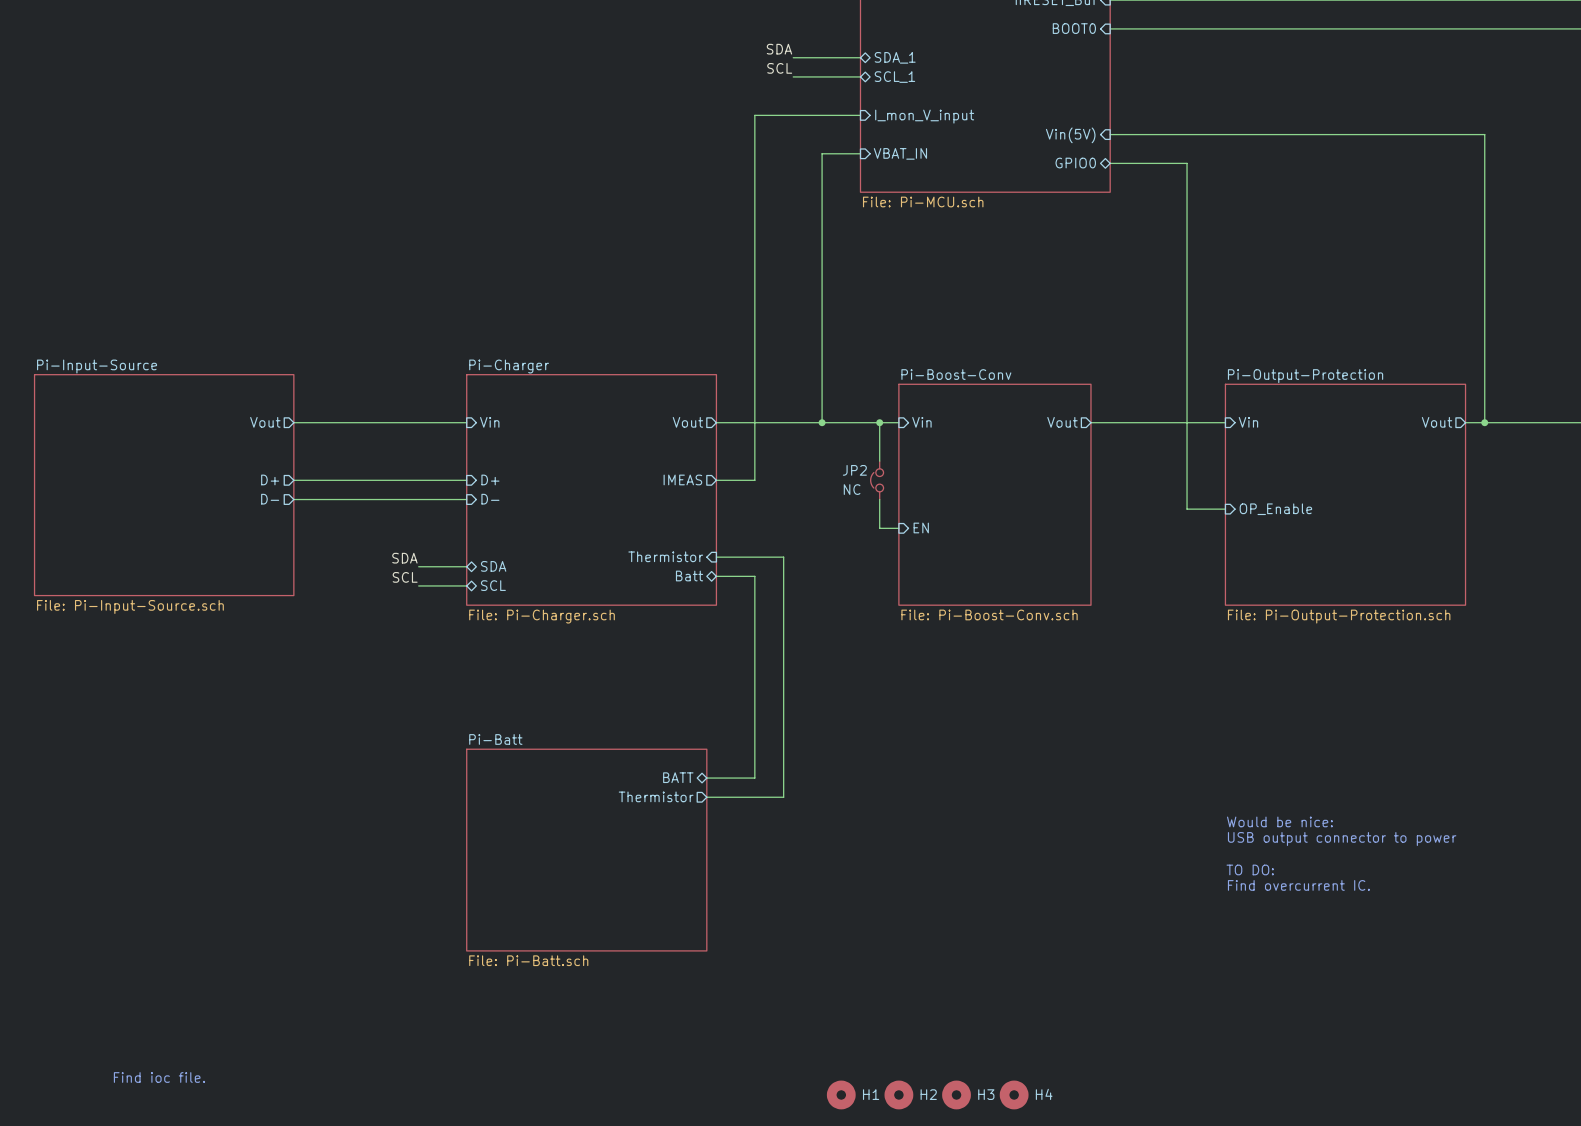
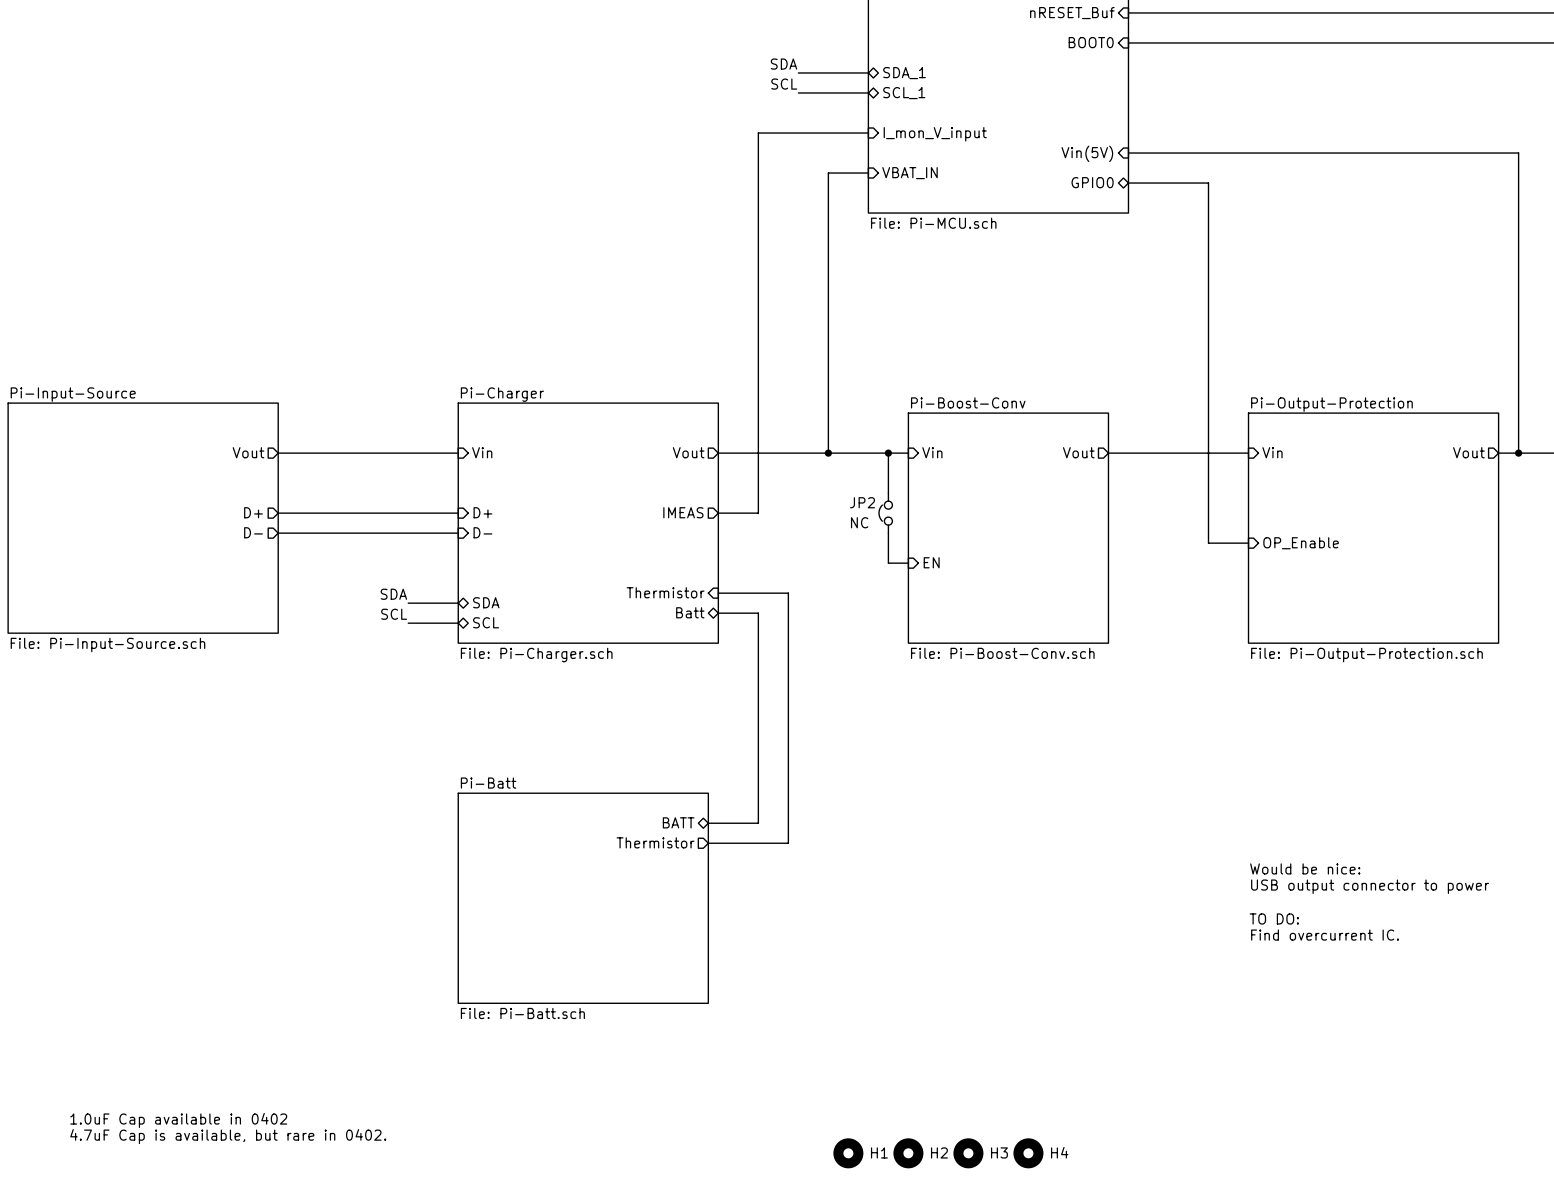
text: none -> 1.0uF Cap available in 0402 (178, 1120)
text: Find ioc file. (159, 1077) -> none
text: none -> 4.7uF Cap is available, but rare in 0402. (228, 1136)

